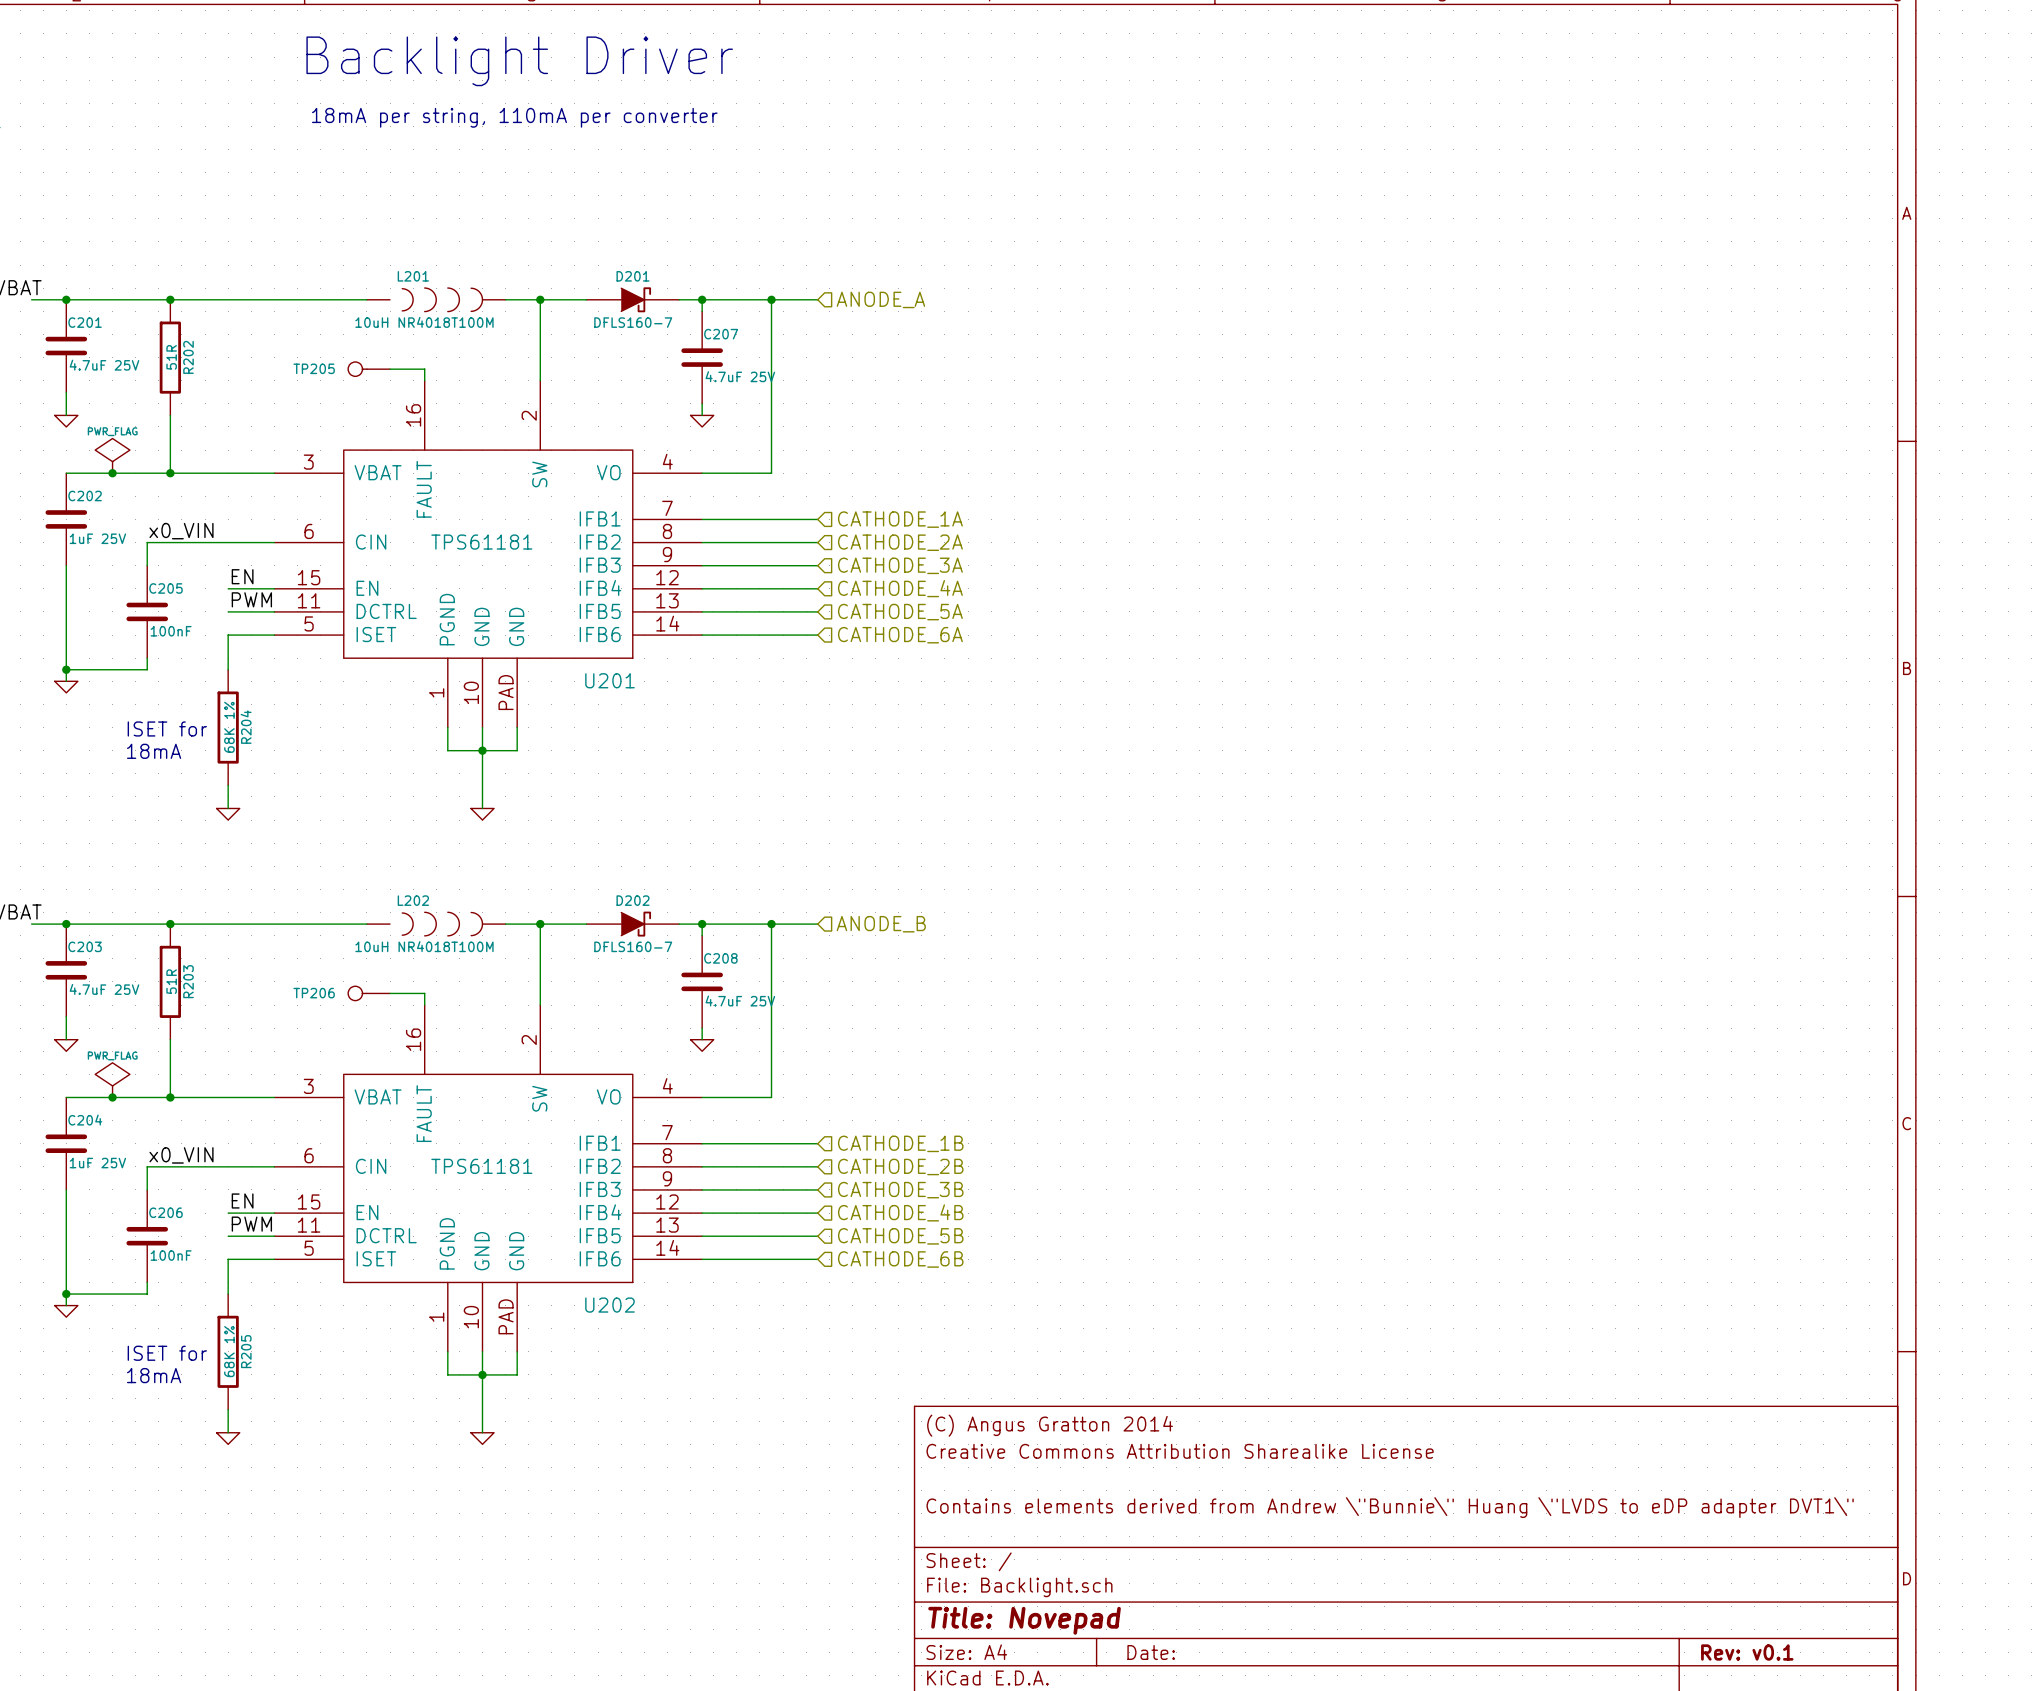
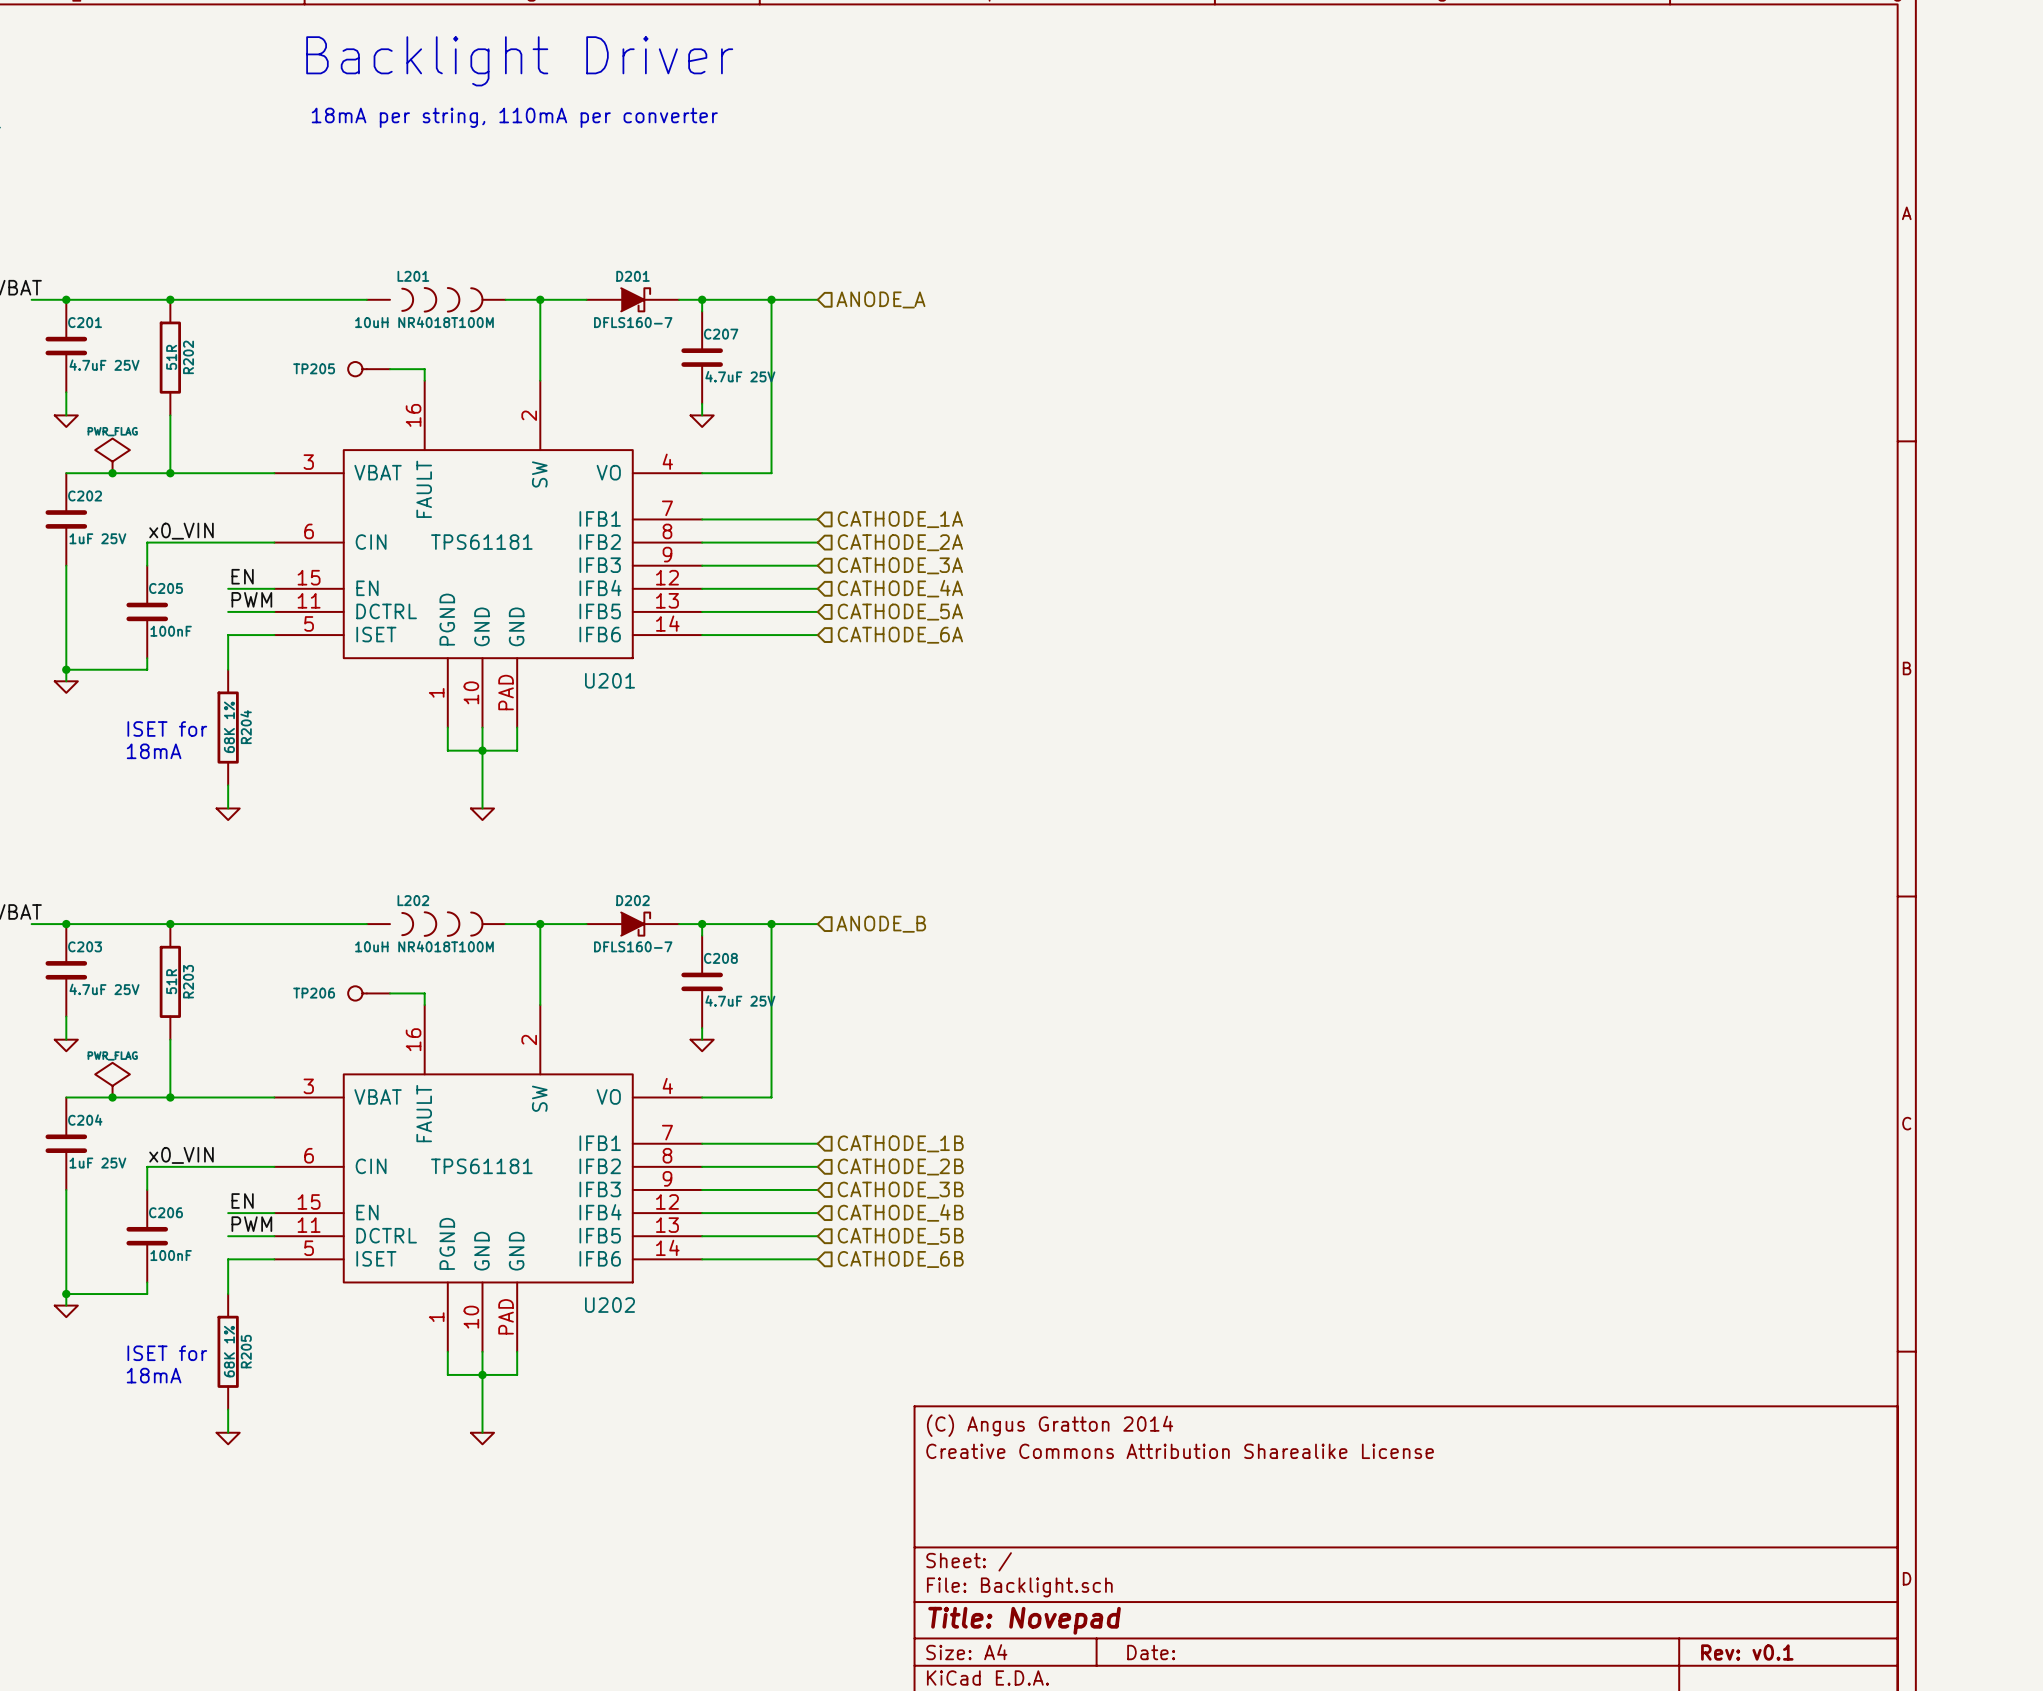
title block: Contains elements derived from Andrew \"Bunnie\" Huang \"LVDS to eDP adapter DVT1\" (1390, 1507) -> none

